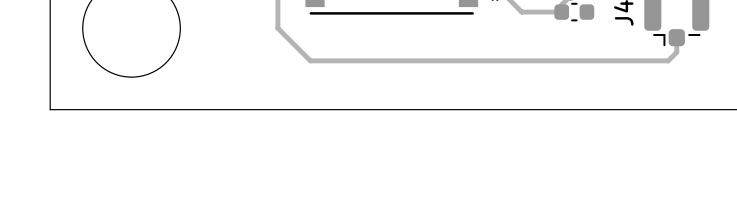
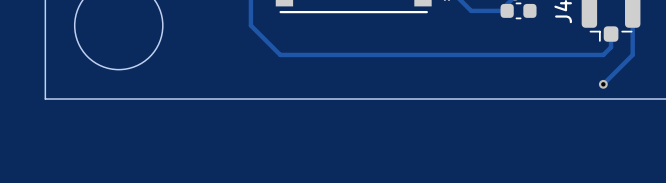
track: none -> (632, 11) (632, 54) (603, 84)
via: none -> (603, 84)

